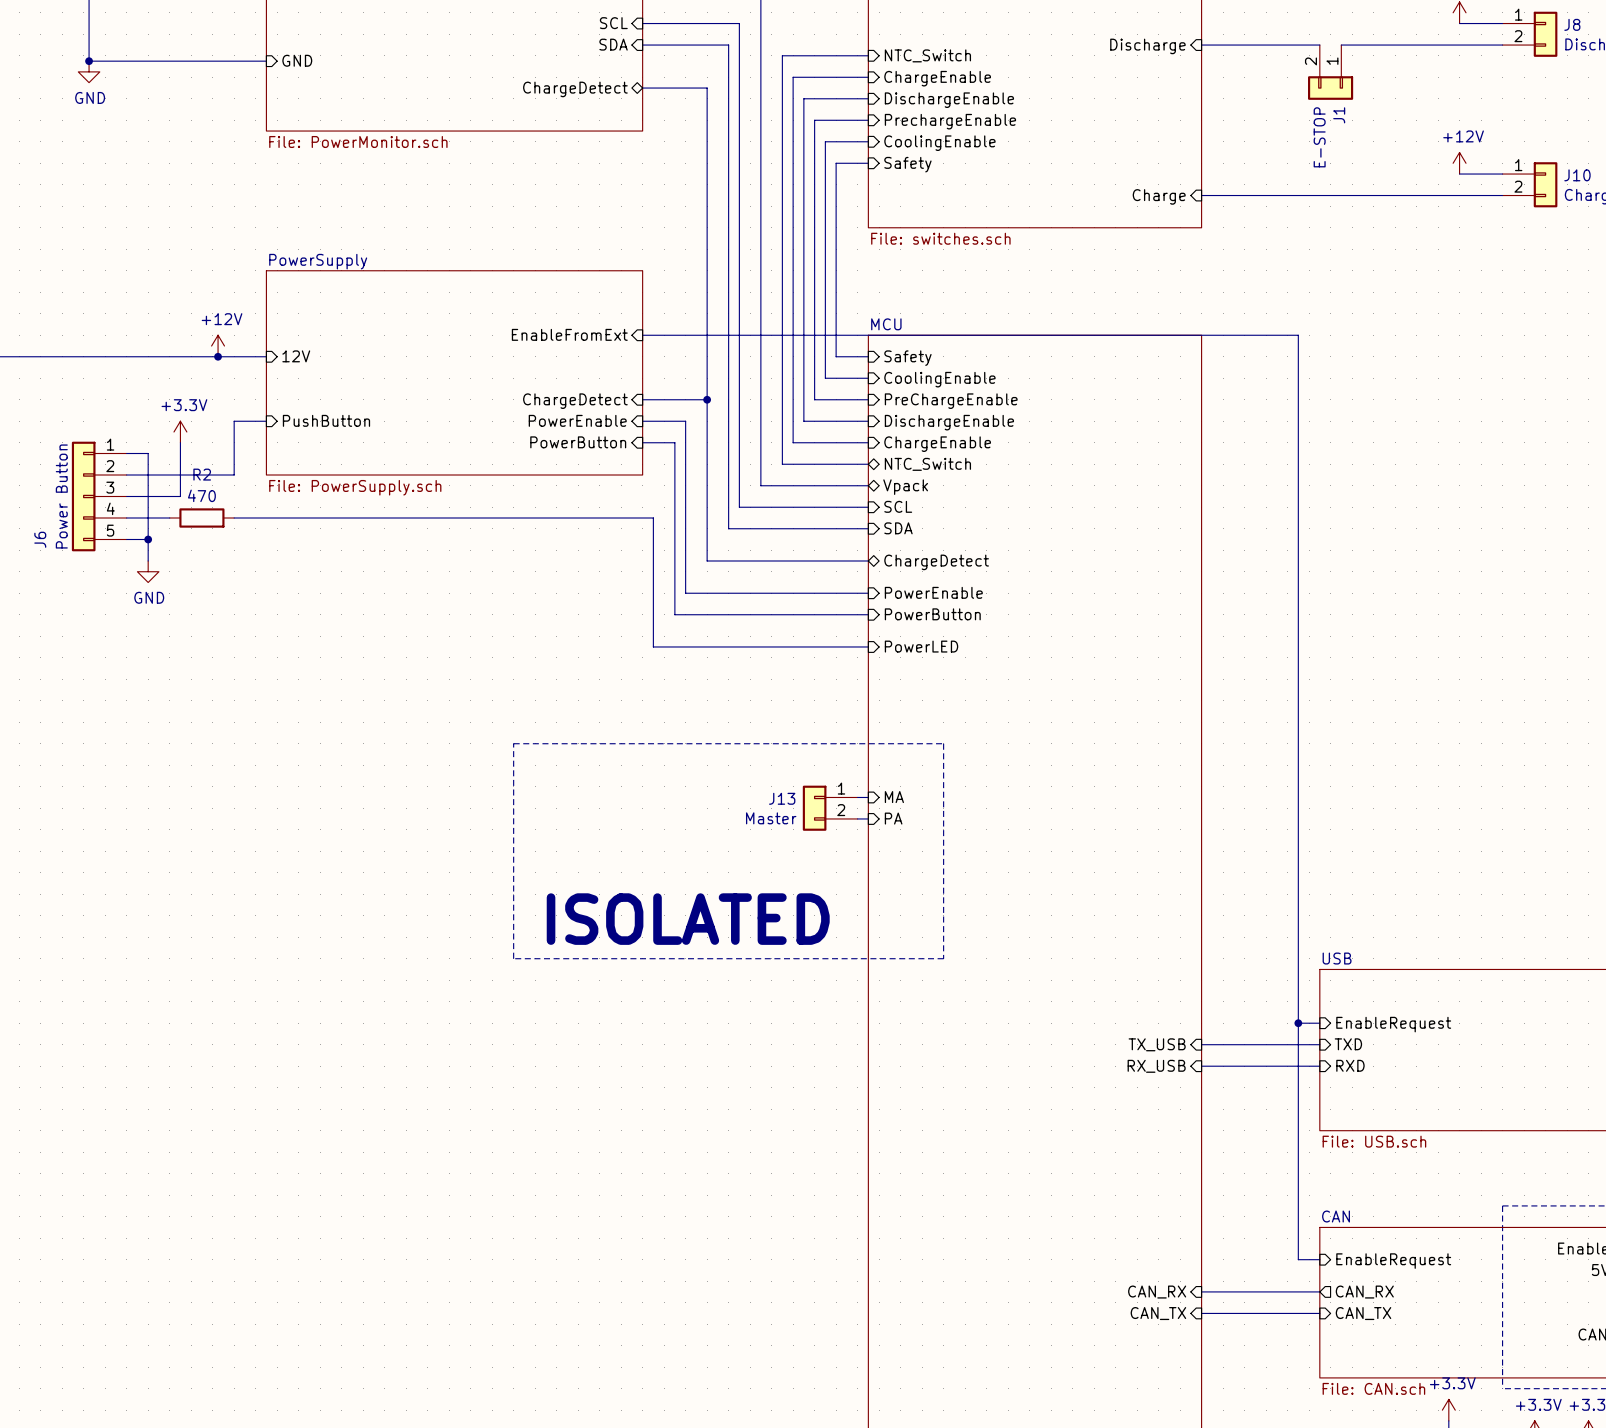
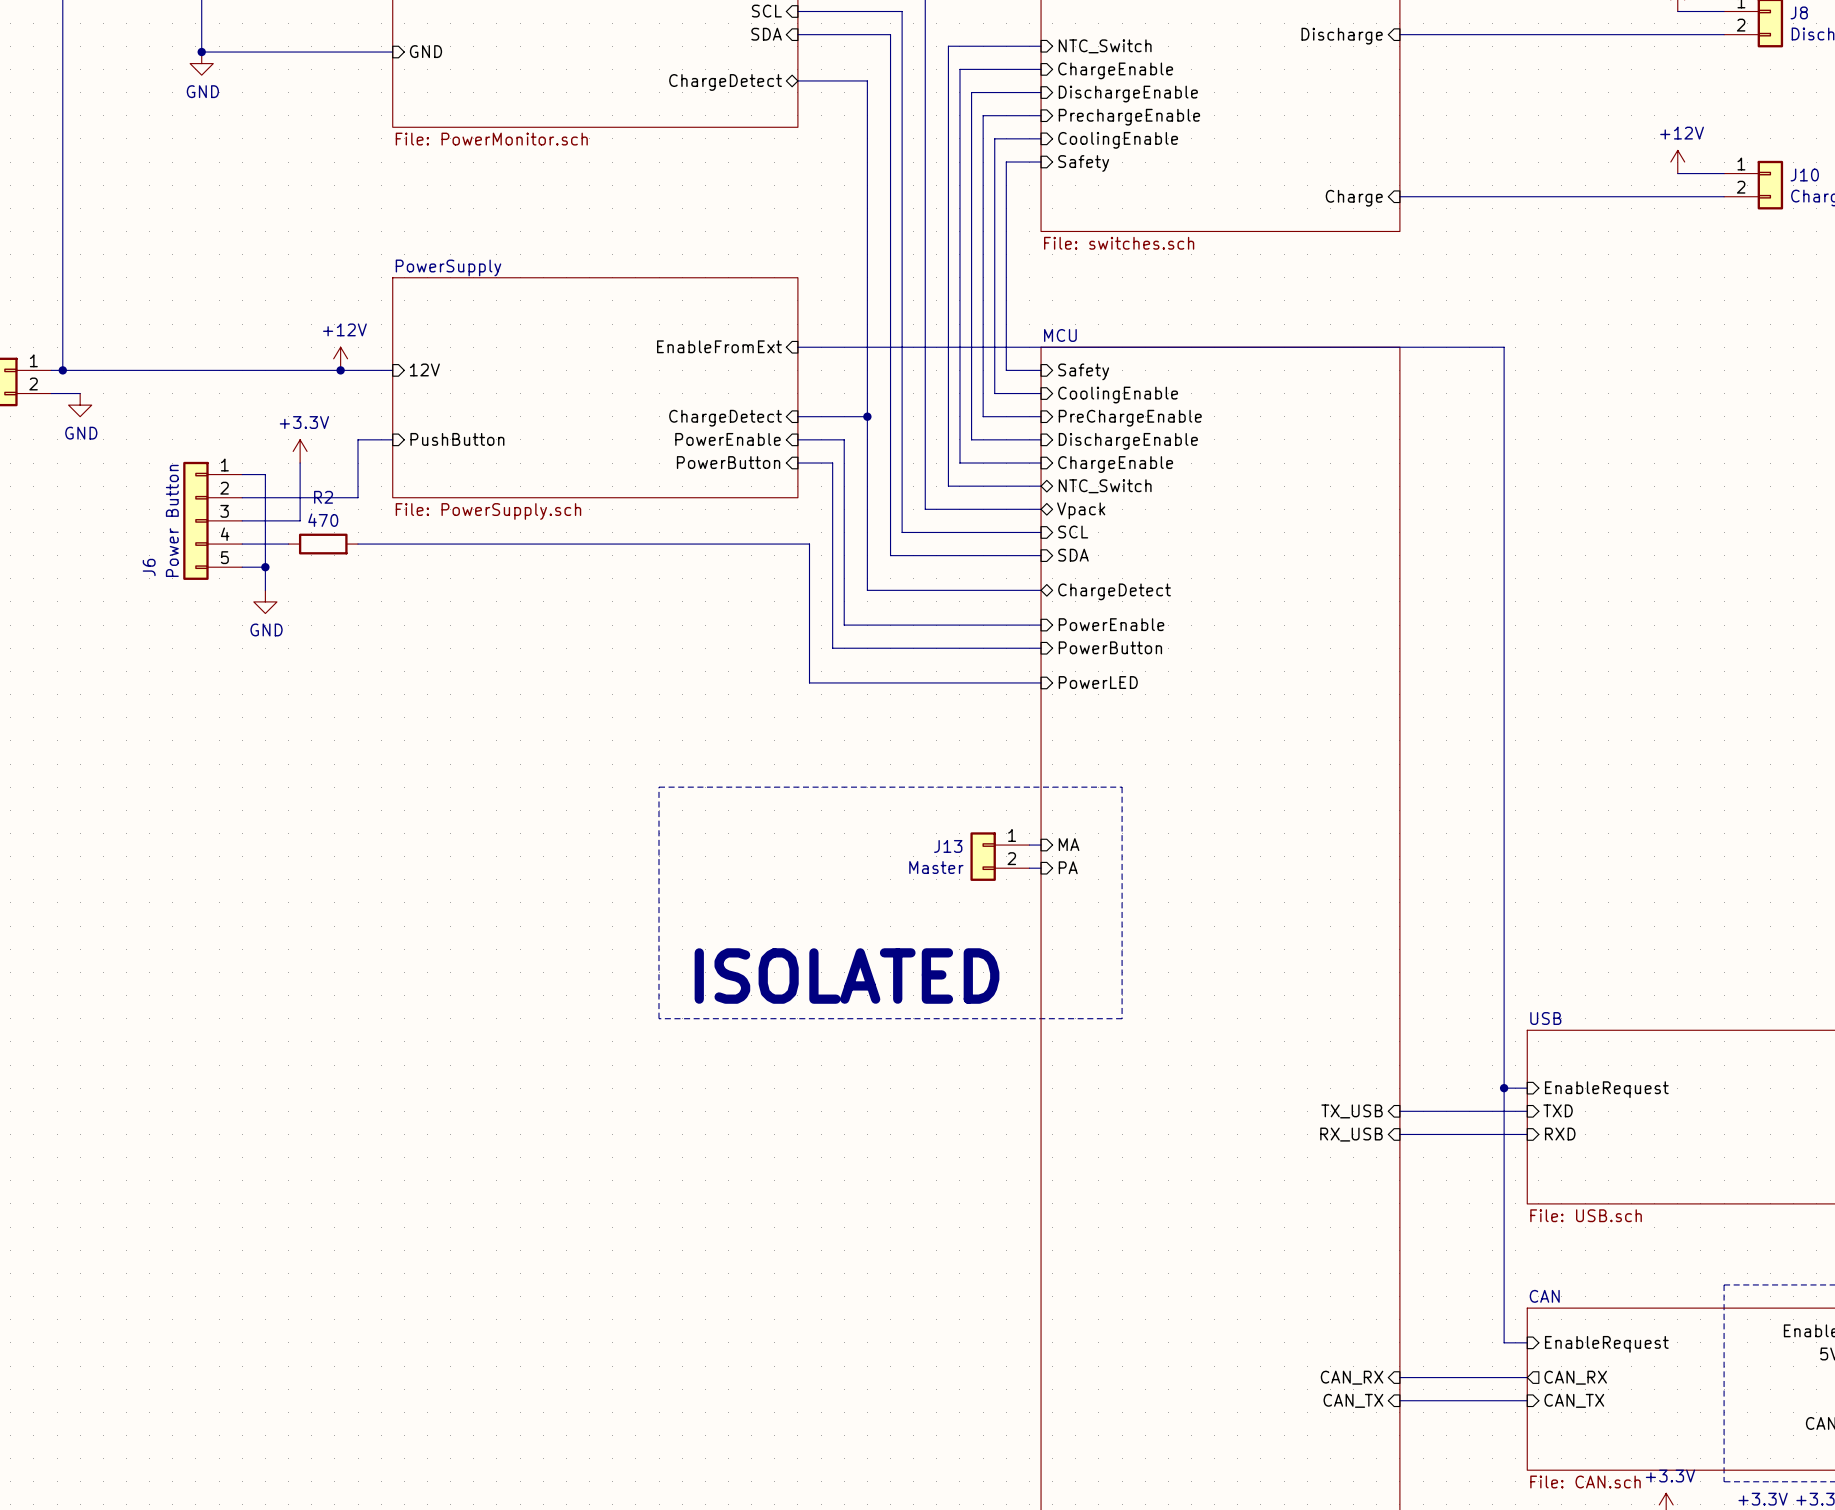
wire: none -> (1527, 34) (1550, 34)
J1: E-STOP (1330, 72) -> none

